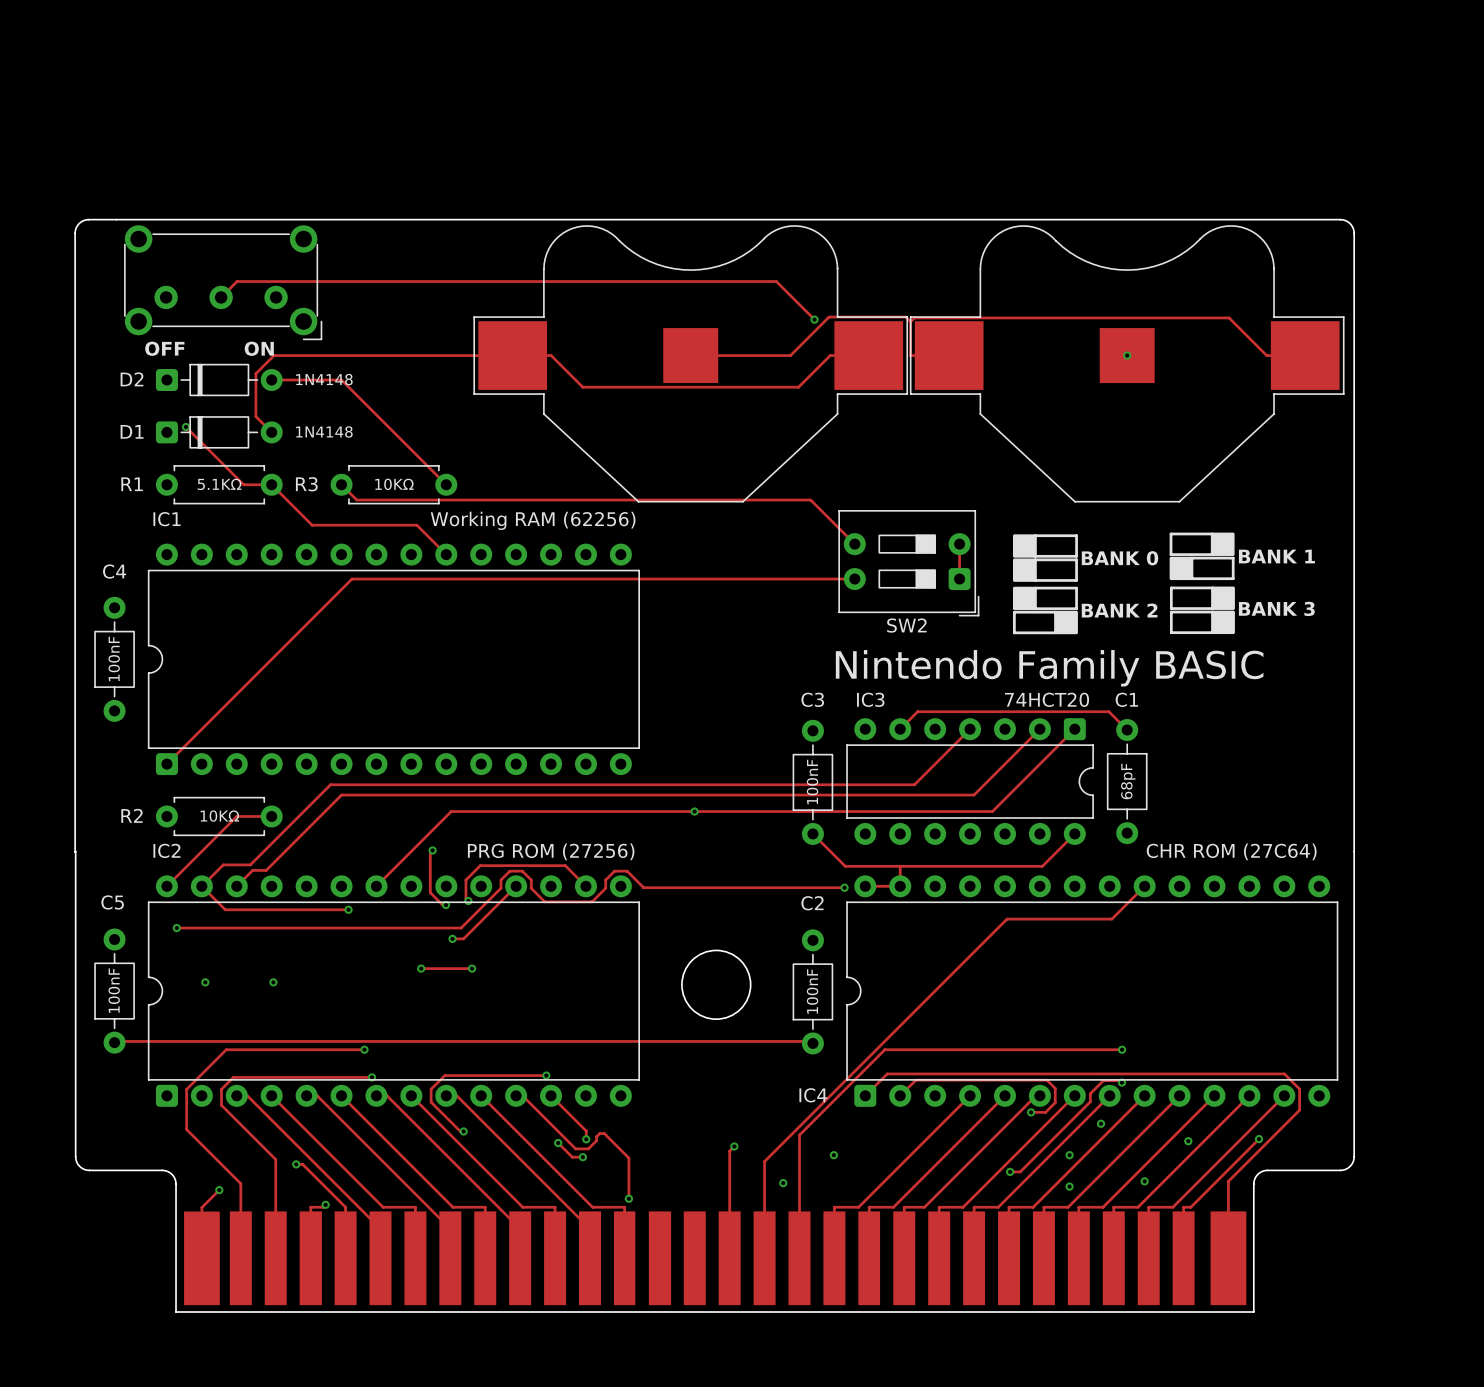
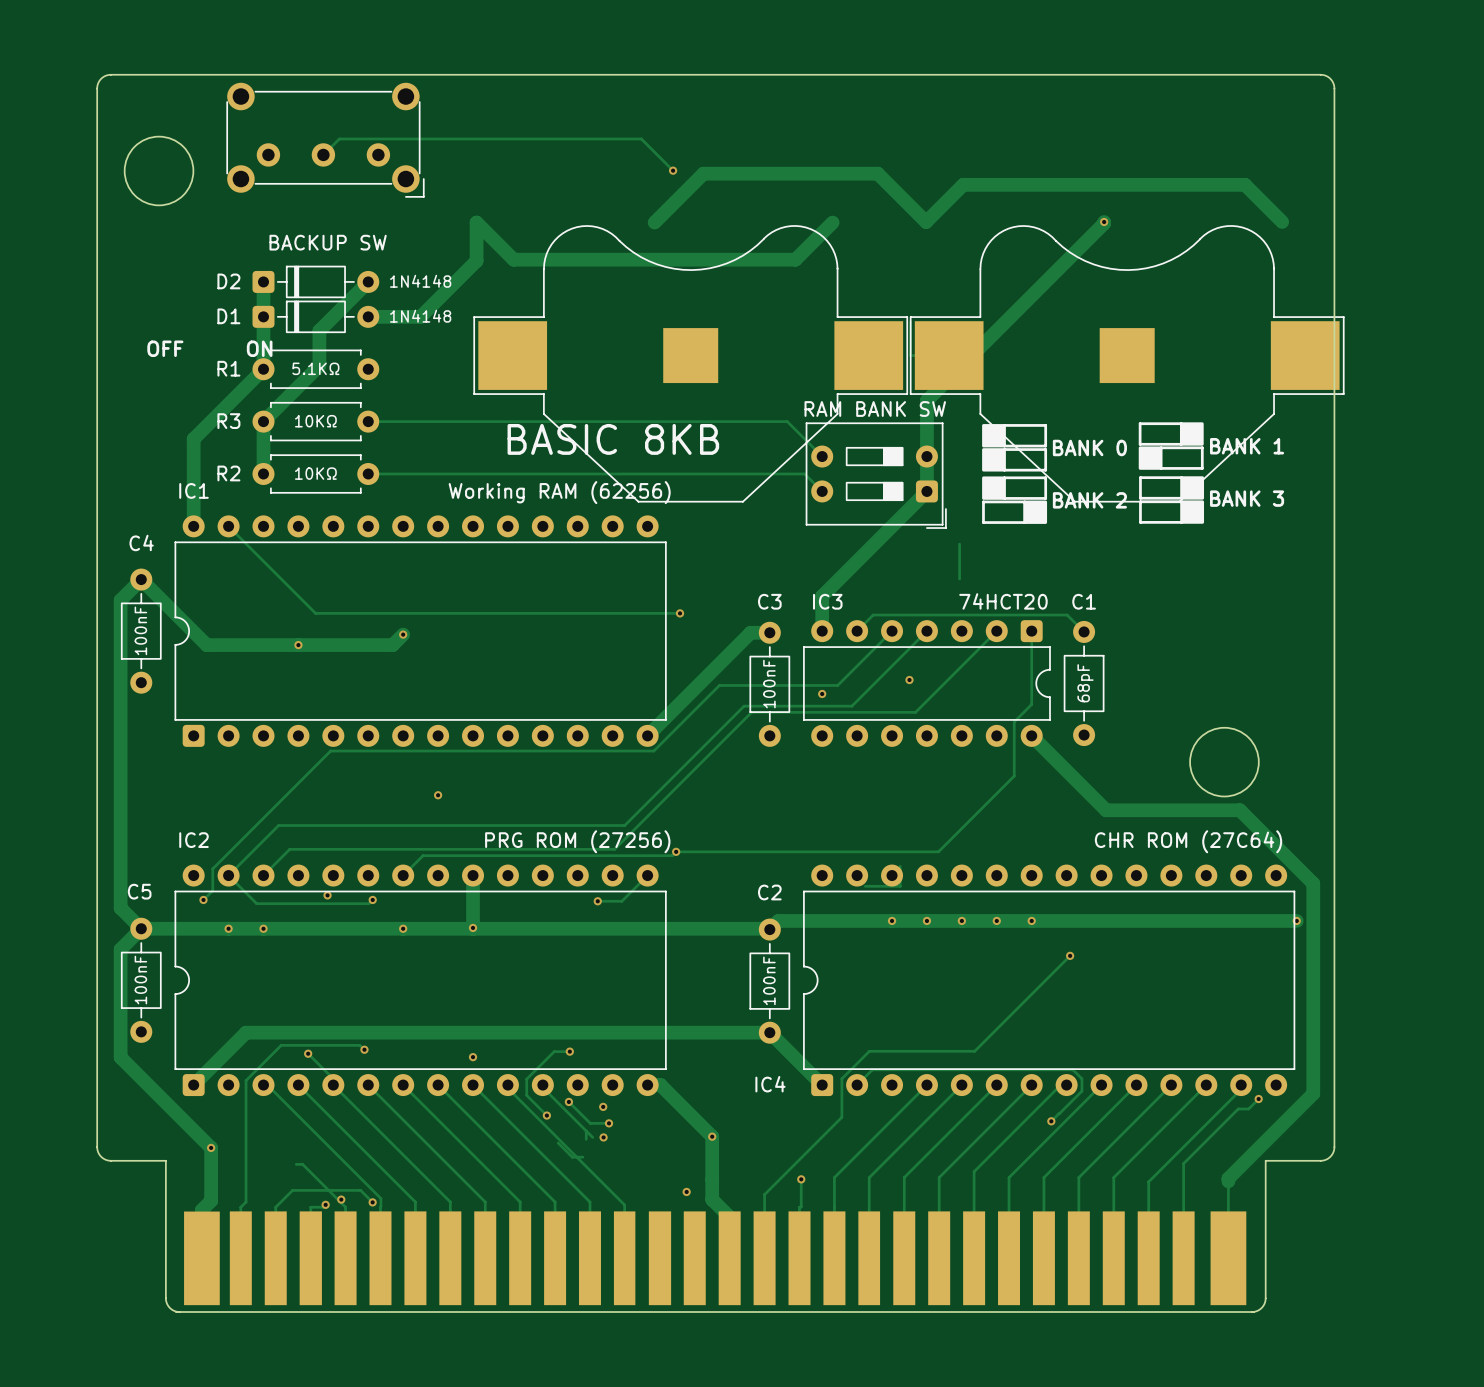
round board edge: none -> [124, 136, 194, 206]
part: none -> BACKUP SW (325, 140)
track: none -> (323, 154) (339, 138) (641, 138) (673, 170)
via: none -> (673, 170)
track: none -> (1104, 221) (926, 400) (926, 491) (822, 596) (822, 631)
via: none -> (1104, 221)
track: none -> (1282, 221) (1245, 184) (963, 184) (926, 221) (877, 173) (703, 173) (654, 222)
track: none -> (832, 222) (795, 259) (513, 259) (476, 222) (476, 260) (420, 316) (368, 316)
track: none -> (263, 281) (263, 369) (193, 439) (193, 526)
track: none -> (368, 281) (319, 330) (319, 365) (263, 421) (263, 473)
part: (223, 282) -> none
track: (221, 297) (237, 281) (776, 281) (814, 319) -> none
via: (814, 319) -> none
track: (690, 355) (790, 355) (829, 317) (905, 317) (910, 321) (914, 317) (1229, 317) (1266, 355) (1305, 355) -> none
track: (868, 355) (830, 355) (798, 387) (582, 387) (551, 355) (274, 355) (255, 373) (255, 416) (271, 432) -> none
via: (1127, 355) -> none
D2 position: (219, 380) -> (315, 281)
track: (271, 380) (341, 380) (446, 484) -> none
track: none -> (368, 421) (787, 421) (822, 456)
drawing: none -> [1180, 422, 1204, 446]
drawing: none -> [982, 424, 1006, 500]
track: (185, 427) (243, 484) (271, 484) (312, 525) (416, 525) (446, 554) -> none
via: (185, 427) -> none
D1 position: (219, 432) -> (315, 316)
text: none -> BASIC 8KB (613, 439)
drawing: none -> [1138, 446, 1163, 470]
track: none -> (368, 473) (804, 473) (822, 491)
part: none -> RAM BANK SW (876, 475)
drawing: none -> [1180, 476, 1205, 524]
R1 position: (219, 484) -> (315, 369)
track: (341, 484) (356, 500) (810, 500) (854, 544) -> none
R3 position: (393, 484) -> (315, 421)
drawing: none -> [1023, 500, 1048, 524]
track: none -> (228, 526) (315, 613) (680, 613)
drawing: [1211, 532, 1235, 556] -> none
line: (1171, 533) (1212, 533) (1212, 554) (1171, 554) (1171, 533) -> (1140, 423) (1181, 423) (1181, 444) (1140, 444) (1140, 423)
drawing: [1013, 534, 1037, 611] -> none
line: (1035, 535) (1035, 556) (1076, 556) (1076, 535) (1035, 535) -> (1004, 425) (1004, 446) (1045, 446) (1045, 425) (1004, 425)
drawing: [1169, 556, 1194, 581] -> none
text position: BANK 1 (1276, 556) -> BANK 1 (1247, 446)
text position: BANK 0 (1119, 558) -> BANK 0 (1089, 447)
line: (1191, 558) (1233, 558) (1233, 578) (1191, 578) (1191, 558) -> (1161, 447) (1202, 447) (1202, 468) (1161, 468) (1161, 447)
line: (1035, 559) (1076, 559) (1076, 580) (1035, 580) (1035, 559) -> (1004, 449) (1045, 449) (1045, 470) (1004, 470) (1004, 449)
SW2: (908, 563) -> none
track: (854, 579) (352, 579) (166, 764) -> none
drawing: [1211, 586, 1235, 635] -> none
line: (1171, 587) (1212, 587) (1212, 608) (1171, 608) (1171, 587) -> (1140, 477) (1181, 477) (1181, 498) (1140, 498) (1140, 477)
line: (1035, 588) (1035, 608) (1076, 608) (1076, 588) (1035, 588) -> (1004, 477) (1004, 498) (1045, 498) (1045, 477) (1004, 477)
text position: BANK 3 (1276, 608) -> BANK 3 (1247, 498)
drawing: [1054, 610, 1078, 635] -> none
text position: BANK 2 (1119, 610) -> BANK 2 (1089, 500)
line: (1014, 612) (1055, 612) (1055, 632) (1014, 632) (1014, 612) -> (983, 501) (1024, 501) (1024, 522) (983, 522) (983, 501)
line: (1171, 612) (1171, 632) (1212, 632) (1212, 612) (1171, 612) -> (1140, 501) (1140, 522) (1181, 522) (1181, 501) (1140, 501)
via: none -> (680, 613)
track: none -> (857, 631) (873, 615) (1067, 615) (1084, 631)
track: none -> (892, 631) (837, 685) (719, 685) (653, 751) (330, 751) (212, 868) (212, 890) (203, 899)
track: none -> (926, 631) (851, 706) (744, 706) (624, 825) (278, 825) (228, 875) (256, 903) (369, 903) (372, 899)
track: none -> (996, 631) (915, 712) (751, 712) (614, 849) (289, 849) (263, 875)
track: none -> (1031, 631) (1031, 704) (1014, 721) (1014, 776) (938, 851) (676, 851) (672, 855) (423, 855) (403, 875)
track: none -> (769, 632) (750, 632) (647, 735)
track: none -> (403, 634) (392, 645) (206, 645) (141, 579) (120, 600) (120, 908) (141, 928)
via: none -> (403, 634)
via: none -> (298, 645)
C4 position: (114, 659) -> (141, 631)
IC1 position: (393, 659) -> (420, 631)
text: Nintendo Family BASIC (1049, 668) -> none
via: none -> (909, 680)
via: none -> (822, 693)
round board edge: none -> [1189, 727, 1260, 797]
track: (900, 729) (917, 711) (1108, 711) (1127, 730) -> none
track: (970, 729) (914, 784) (330, 784) (250, 864) (223, 864) (201, 886) (225, 909) (348, 909) -> none
track: (1039, 729) (974, 795) (341, 795) (266, 870) (252, 870) (236, 886) -> none
track: (1074, 729) (992, 811) (451, 811) (376, 886) -> none
IC3 position: (970, 781) -> (926, 683)
C1 position: (1127, 781) -> (1084, 683)
C3 position: (812, 782) -> (769, 684)
via: none -> (438, 795)
via position: (694, 811) -> (676, 851)
R2 position: (219, 816) -> (315, 473)
track: (271, 816) (236, 816) (166, 886) -> none
track: (812, 833) (845, 866) (1042, 866) (1074, 833) -> none
track: (432, 850) (430, 852) (430, 892) (442, 905) (445, 905) -> none
via: (432, 850) -> none
track: none -> (473, 875) (473, 928)
track: none -> (647, 875) (621, 901) (597, 901)
track: (516, 886) (463, 938) (452, 938) -> none
track: (585, 886) (565, 865) (480, 865) (465, 880) (465, 898) (468, 901) -> none
track: (1144, 886) (1111, 919) (1007, 919) (764, 1161) (764, 1194) -> (1070, 955) (974, 1051) (869, 1051) (841, 1078) (841, 1117) (764, 1194)
track: (844, 887) (643, 887) (627, 871) (614, 871) (605, 880) (605, 888) (592, 901) (544, 901) (531, 888) (531, 880) (522, 871) (509, 871) (500, 880) (500, 888) (461, 928) (176, 928) -> none
via: (844, 887) -> none
via: none -> (327, 895)
via: none -> (203, 899)
via: none -> (372, 899)
via: (468, 901) -> none
via: none -> (597, 901)
via: (445, 905) -> none
via: (348, 909) -> none
via: none -> (892, 920)
via: none -> (926, 920)
via: none -> (961, 920)
via: none -> (996, 920)
via: none -> (1031, 920)
track: none -> (1296, 920) (778, 920) (769, 929) (141, 928)
via: none -> (1296, 920)
via: none -> (473, 927)
via: (176, 928) -> none
via: none -> (228, 928)
via: none -> (263, 928)
via: none -> (403, 928)
via: (452, 938) -> none
round board edge: [681, 949, 752, 1020] -> none
via: none -> (1070, 955)
track: (421, 968) (472, 968) -> none
via: (421, 968) -> none
via: (472, 968) -> none
via: (205, 982) -> none
via: (273, 982) -> none
C5 position: (114, 991) -> (141, 980)
IC2 position: (393, 991) -> (420, 980)
C2 position: (812, 991) -> (769, 981)
IC4 position: (1092, 991) -> (1049, 980)
track: (114, 1042) (810, 1041) (812, 1043) -> none
track: (364, 1049) (226, 1049) (186, 1089) (186, 1129) (240, 1183) (240, 1207) -> (365, 1050) (359, 1045) (281, 1045) (246, 1080) (246, 1202) (240, 1207)
track: (1122, 1049) (884, 1049) (799, 1135) (799, 1207) -> (801, 1179) (801, 1206) (799, 1207)
via: (1122, 1049) -> none
track: none -> (569, 1051) (554, 1051) (526, 1079) (526, 1095) (546, 1115)
via: none -> (569, 1051)
via: none -> (308, 1053)
via: none -> (473, 1057)
track: (546, 1075) (444, 1075) (431, 1089) (431, 1102) (460, 1131) (463, 1131) -> none
via: (546, 1075) -> none
track: (371, 1077) (233, 1077) (221, 1089) (221, 1105) (275, 1159) (275, 1207) -> (372, 1202) (360, 1190) (292, 1190) (275, 1207)
via: (371, 1077) -> none
track: (1122, 1082) (1120, 1080) (1103, 1080) (1090, 1093) (1090, 1101) (1020, 1171) (1010, 1171) -> none
via: (1122, 1082) -> none
track: none -> (193, 1085) (246, 1032) (769, 1032) (822, 1085)
track: none -> (857, 1085) (872, 1069) (1072, 1069) (1081, 1078) (1081, 1091) (1051, 1121)
track: (236, 1095) (247, 1095) (380, 1228) -> (263, 1085) (267, 1085) (380, 1198) (380, 1228)
track: (271, 1095) (383, 1207) (415, 1207) -> (298, 1085) (415, 1202) (415, 1207)
track: (306, 1095) (317, 1095) (450, 1228) -> (308, 1053) (333, 1078) (333, 1085) (450, 1202) (450, 1228)
track: (341, 1095) (452, 1207) (485, 1207) -> (368, 1085) (485, 1202) (485, 1207)
track: (376, 1095) (387, 1095) (520, 1228) -> (403, 1085) (520, 1202) (520, 1228)
track: (411, 1095) (522, 1207) (555, 1207) -> (438, 1085) (555, 1202) (555, 1207)
track: (446, 1095) (456, 1095) (590, 1228) -> (473, 1085) (590, 1202) (590, 1228)
track: (481, 1095) (592, 1207) (624, 1207) -> (507, 1085) (507, 1088) (624, 1205) (624, 1207)
track: (516, 1095) (522, 1095) (575, 1148) (588, 1148) (596, 1140) (596, 1136) (599, 1133) (604, 1133) (628, 1158) (628, 1198) -> none
track: (865, 1095) (887, 1073) (1284, 1073) (1299, 1089) (1299, 1110) (1228, 1181) -> (1031, 735) (1106, 810) (1240, 810) (1313, 883) (1313, 1093) (1228, 1178) (1228, 1181)
track: (900, 1095) (915, 1080) (1047, 1080) (1055, 1088) (1055, 1102) (1045, 1112) (1031, 1112) -> none
track: (970, 1095) (858, 1207) (834, 1207) -> (926, 1085) (834, 1177) (834, 1207)
track: (1004, 1095) (893, 1207) (869, 1207) -> (961, 1085) (869, 1177) (869, 1207)
track: (1039, 1095) (1035, 1095) (924, 1207) (904, 1207) -> (996, 1085) (904, 1177) (904, 1207)
track: (1074, 1095) (963, 1207) (939, 1207) -> (1031, 1085) (939, 1177) (939, 1207)
track: (1109, 1095) (998, 1207) (974, 1207) -> (1066, 1085) (1060, 1085) (974, 1171) (974, 1207)
track: (1144, 1095) (1033, 1207) (1009, 1207) -> (1101, 1085) (1009, 1177) (1009, 1207)
track: (1179, 1095) (1068, 1207) (1043, 1207) -> (1136, 1085) (1043, 1177) (1043, 1207)
track: (1214, 1095) (1103, 1207) (1078, 1207) -> (1171, 1085) (1078, 1177) (1078, 1207)
track: (1249, 1095) (1137, 1207) (1113, 1207) -> (1206, 1085) (1113, 1177) (1113, 1207)
track: (1284, 1095) (1172, 1207) (1148, 1207) -> (1241, 1085) (1241, 1089) (1148, 1181) (1148, 1207)
track: none -> (568, 1101) (590, 1123) (609, 1123)
via: none -> (568, 1101)
via: none -> (603, 1106)
via: (1031, 1112) -> none
via: none -> (546, 1115)
via: none -> (1051, 1121)
via: none -> (609, 1123)
via: (1101, 1123) -> none
via: (463, 1131) -> none
via: none -> (603, 1137)
via: (586, 1139) -> none
track: (1259, 1139) (1190, 1207) (1183, 1207) -> (1258, 1099) (1248, 1108) (1238, 1108) (1183, 1163) (1183, 1207)
via position: (1259, 1139) -> (1258, 1099)
via: (1188, 1141) -> none
via: (558, 1143) -> none
track: (734, 1146) (729, 1151) (729, 1217) -> (647, 1085) (660, 1085) (712, 1136) (712, 1199) (729, 1217)
via position: (734, 1146) -> (712, 1136)
via: (833, 1155) -> none
via: (1069, 1155) -> none
via: (582, 1157) -> none
via: (296, 1164) -> none
via: (1010, 1171) -> none
via: (1144, 1181) -> none
via position: (783, 1183) -> (801, 1179)
via: (1069, 1186) -> none
track: (219, 1190) (201, 1207) (201, 1210) -> (141, 928) (120, 949) (120, 1057) (211, 1147) (211, 1200) (201, 1210)
via position: (219, 1190) -> (211, 1147)
via: none -> (686, 1191)
via: (628, 1198) -> none
via: none -> (341, 1199)
via: none -> (372, 1202)
board edge: (176, 1312) (176, 1184) (173, 1176) (163, 1170) (86, 1170) (79, 1166) (75, 1158) (75, 233) (79, 223) (87, 219) (1340, 219) (1350, 223) (1354, 233) (1354, 1158) (1350, 1166) (1343, 1170) (1266, 1170) (1255, 1176) (1253, 1184) (1253, 1312) -> none
board edge: none -> (179, 1312) (169, 1308) (165, 1299) (165, 1160) (107, 1160) (101, 1156) (97, 1148) (97, 88) (101, 78) (110, 74) (1322, 74) (1331, 79) (1334, 88) (1334, 1148) (1330, 1156) (1323, 1160) (1265, 1160) (1265, 1299) (1261, 1308) (1251, 1312)

